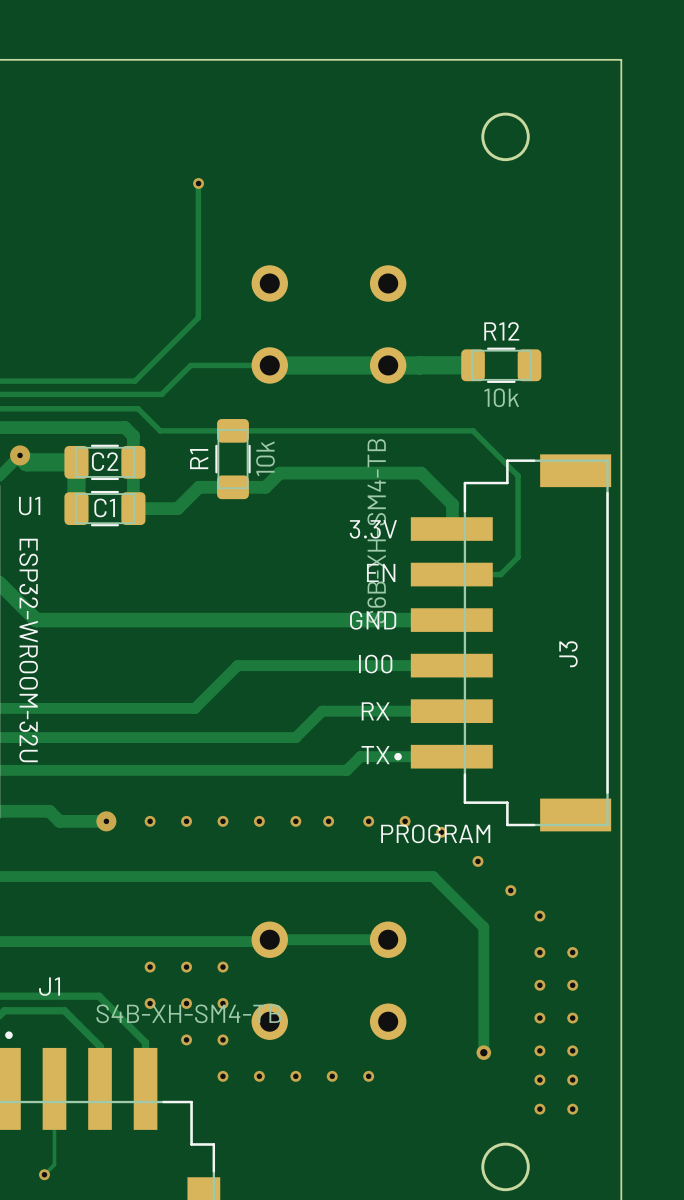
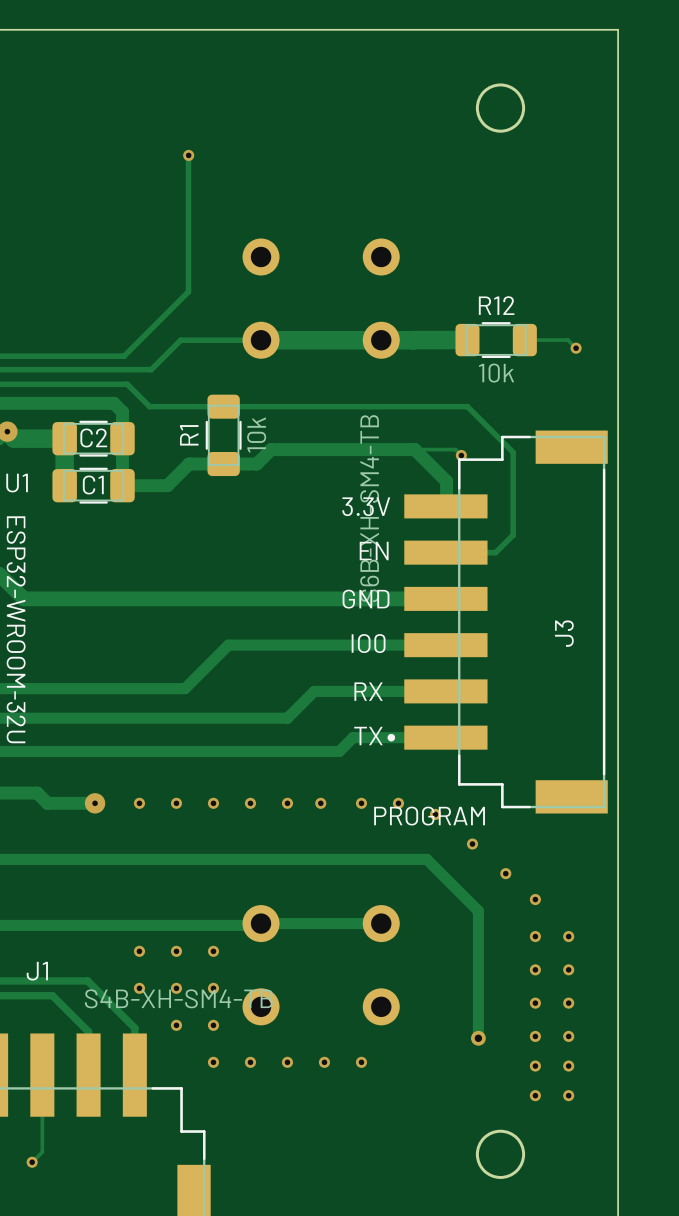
track: none -> (524, 340) (567, 340) (576, 348)
via: none -> (576, 348)
track: none -> (414, 449) (455, 449) (461, 455)
via: none -> (461, 455)

